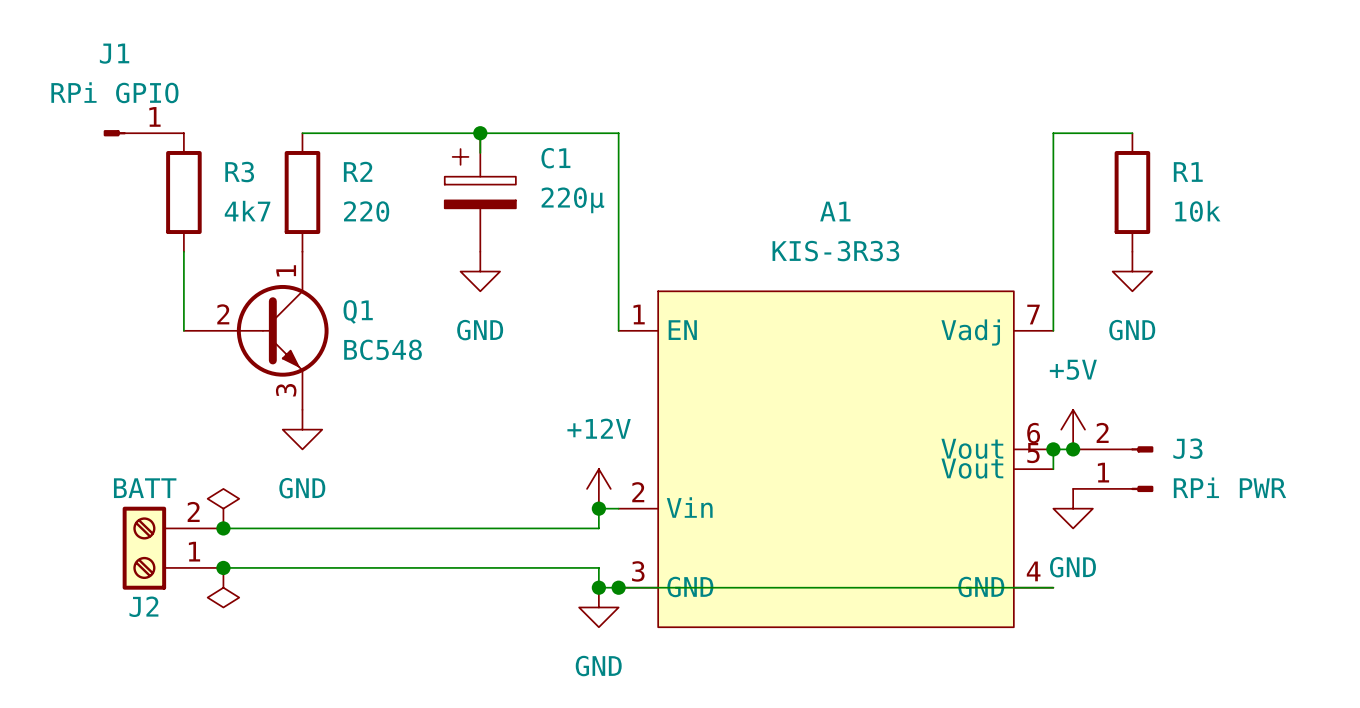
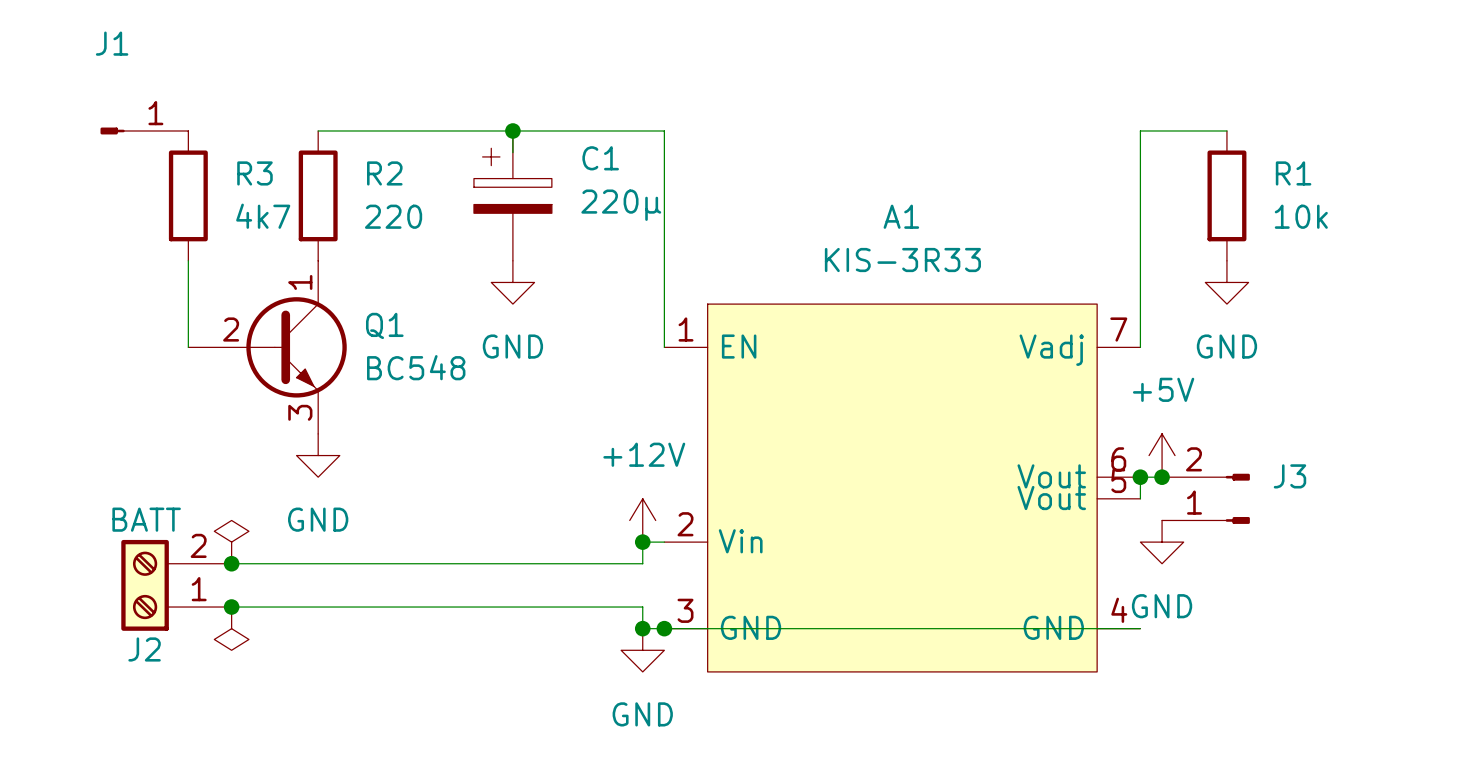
J1 value: RPi GPIO (114, 92) -> none
J3 value: RPi PWR (1229, 487) -> none

